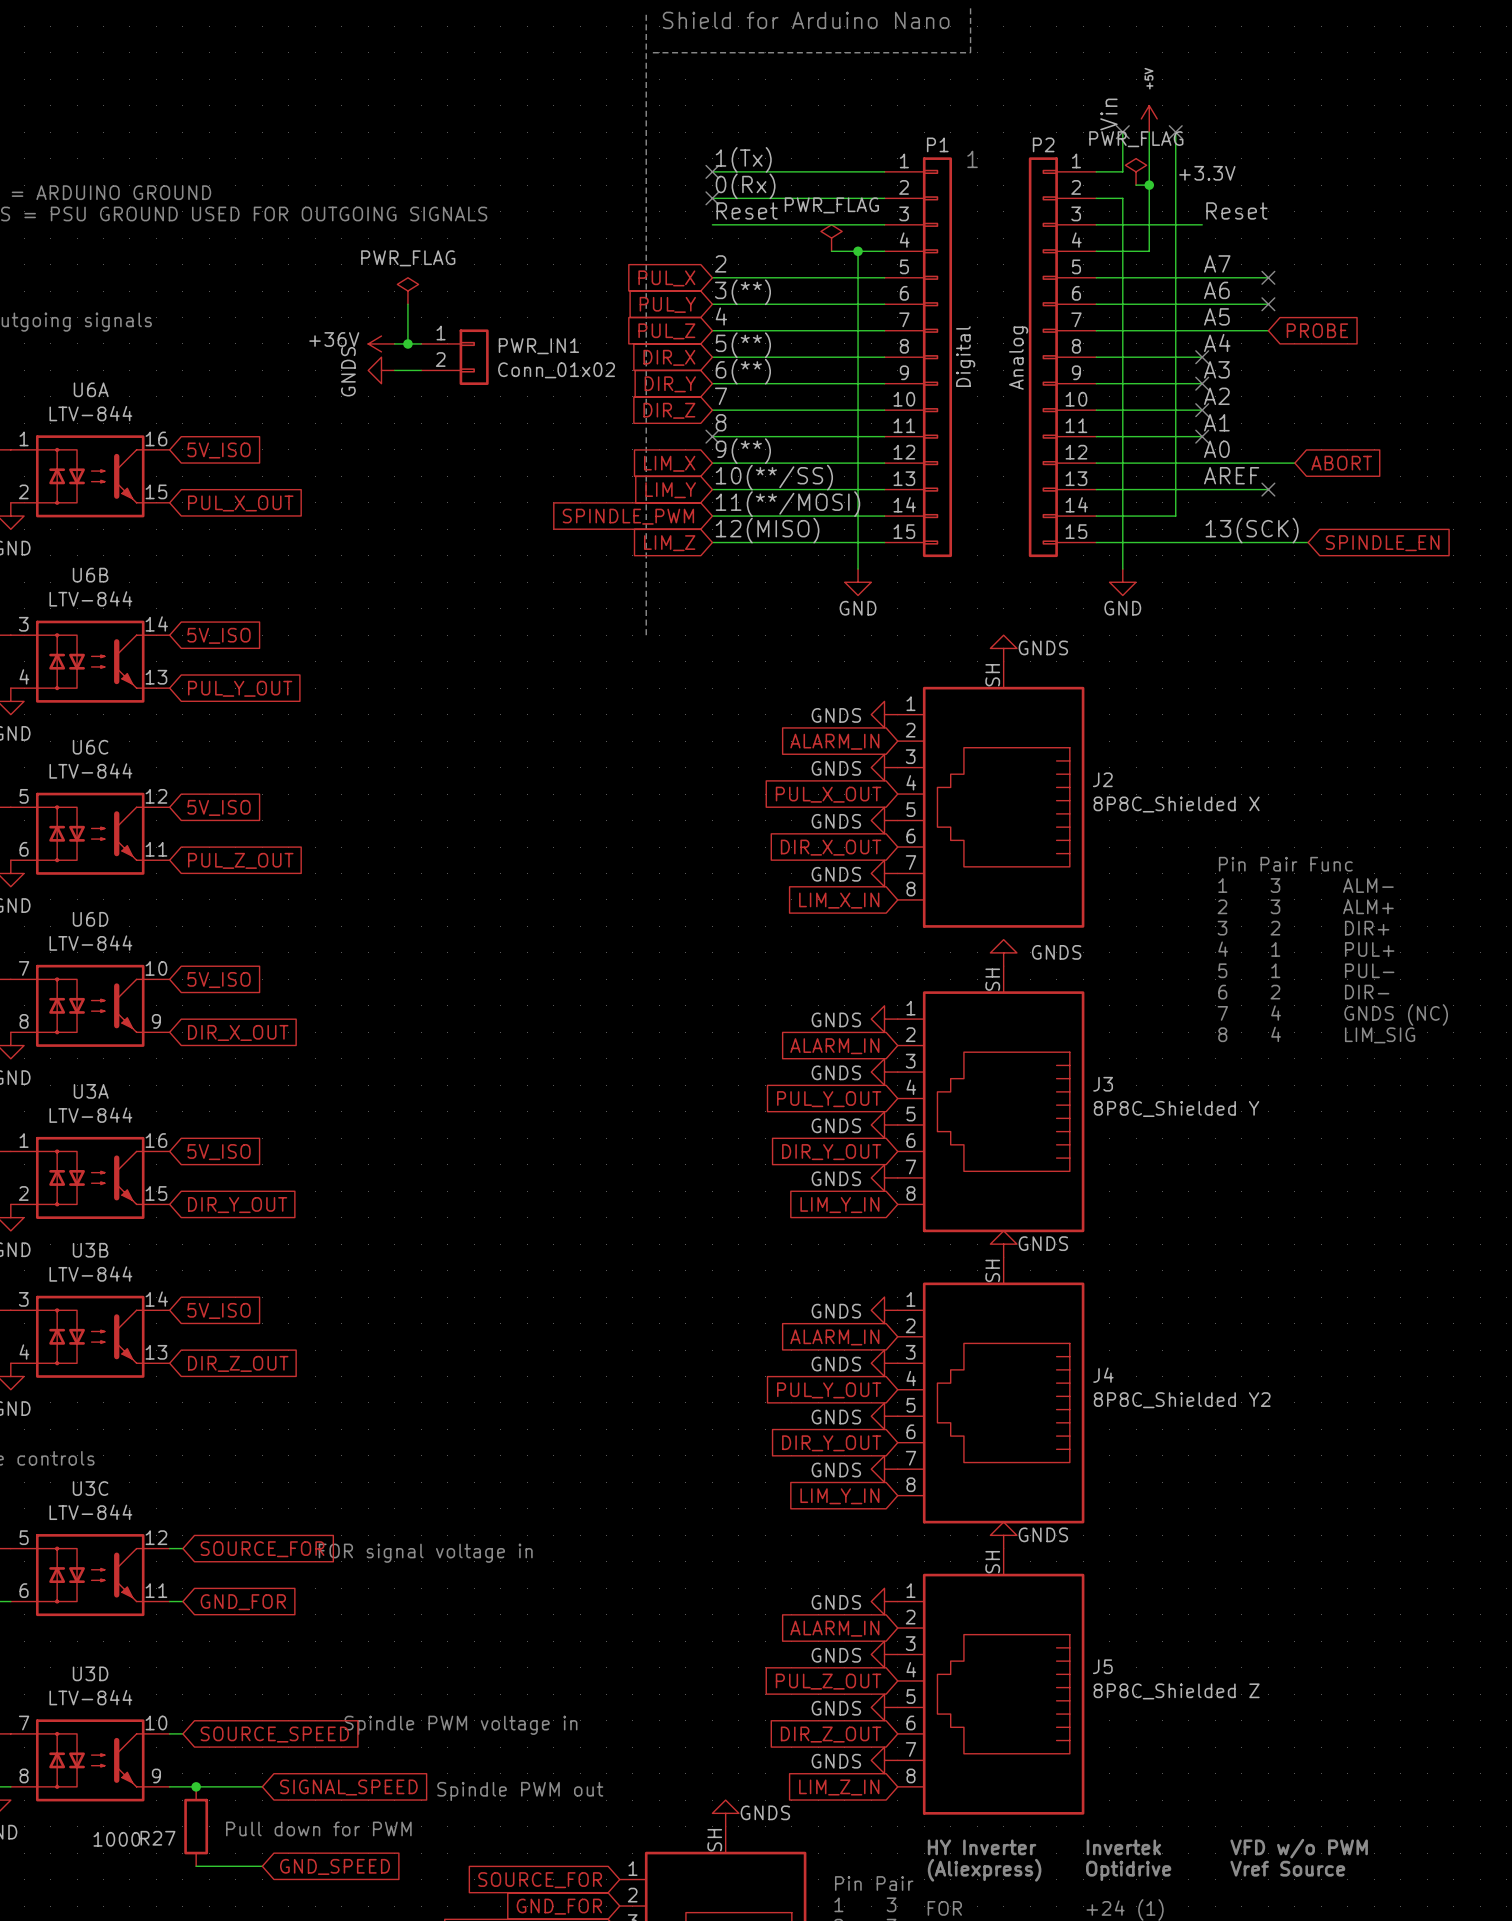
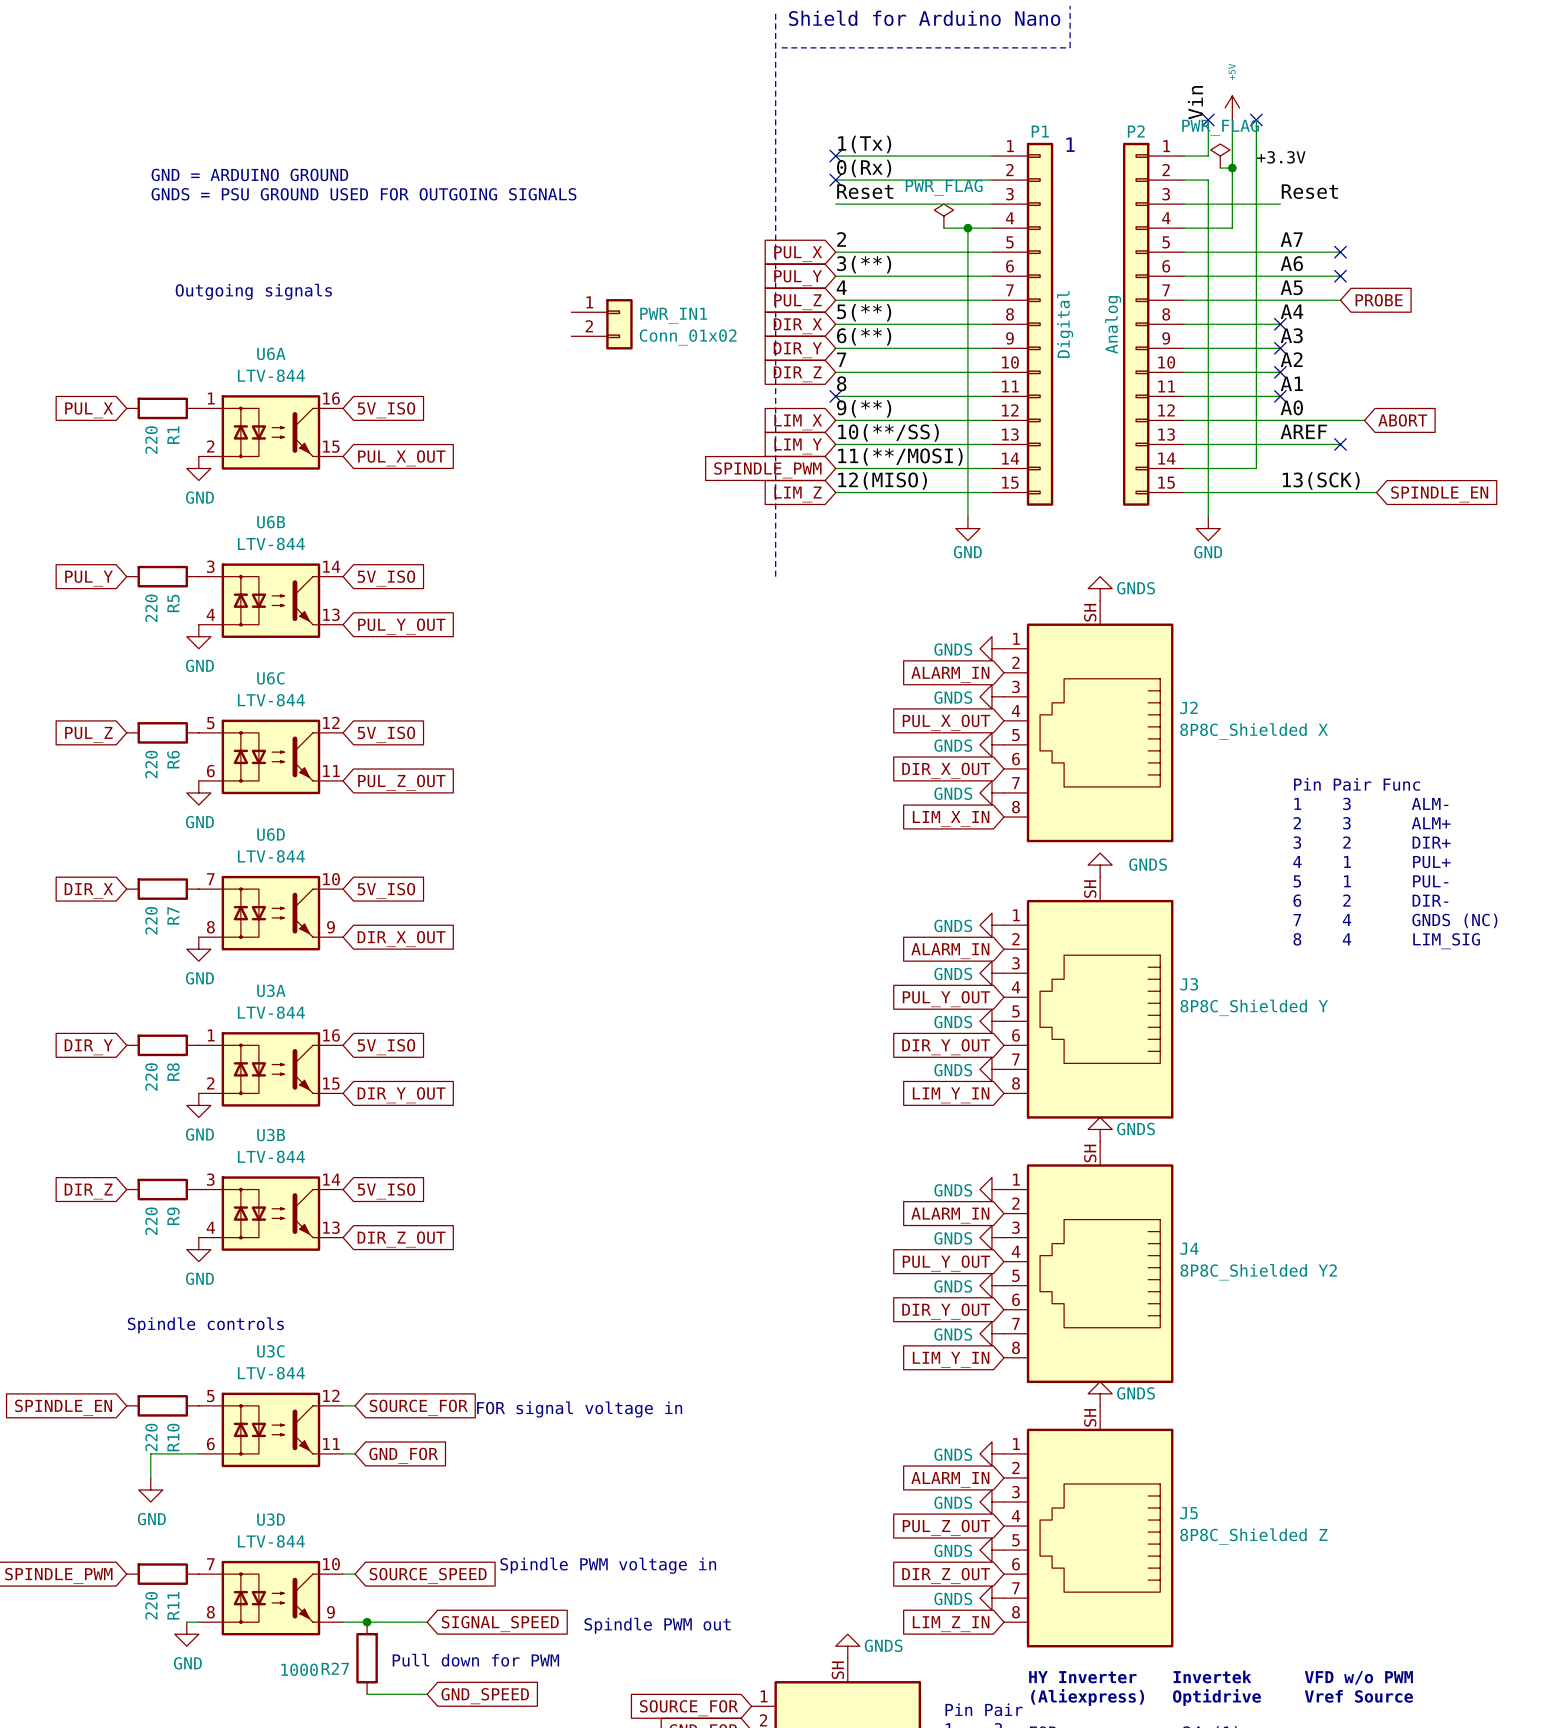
power symbol: PWR_FLAG (407, 291) -> none
wire: (407, 304) (407, 343) -> none
power symbol: +36V (381, 343) -> none
wire: (394, 343) (421, 343) -> none
junction: (407, 343) -> none
power symbol: GNDS (381, 370) -> none
wire: (394, 370) (421, 370) -> none

